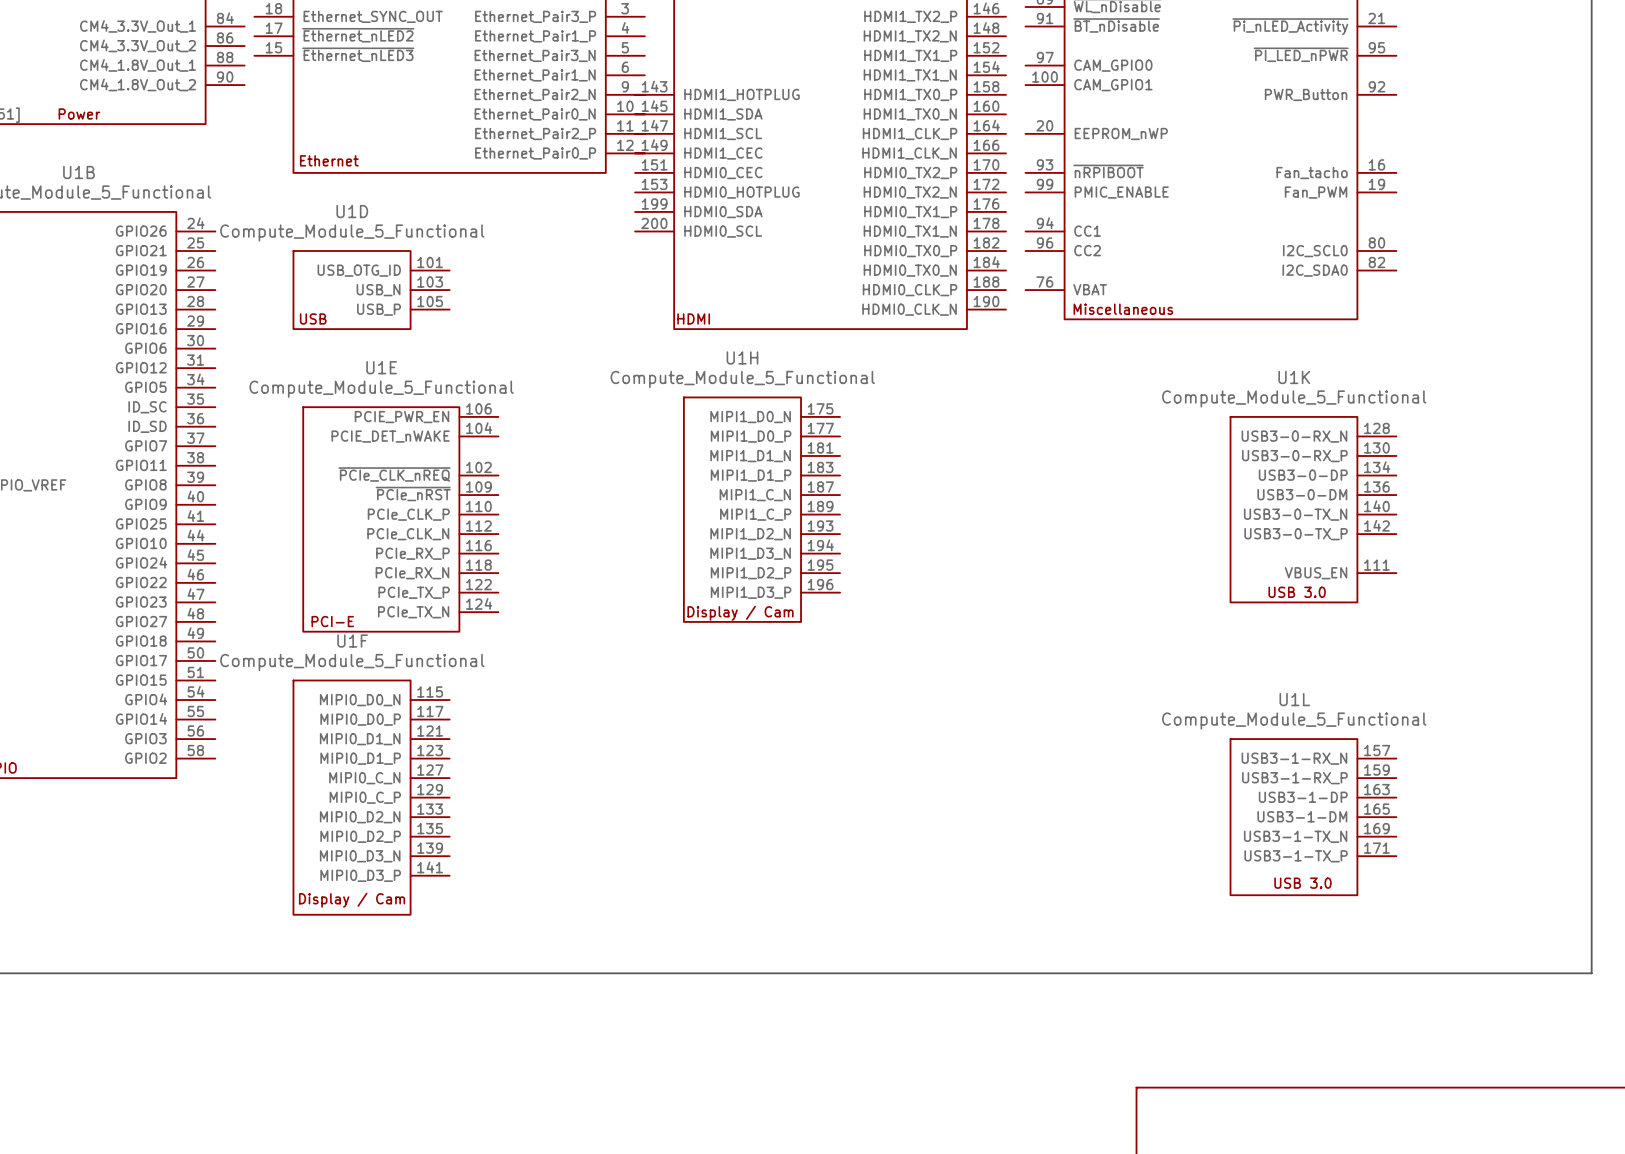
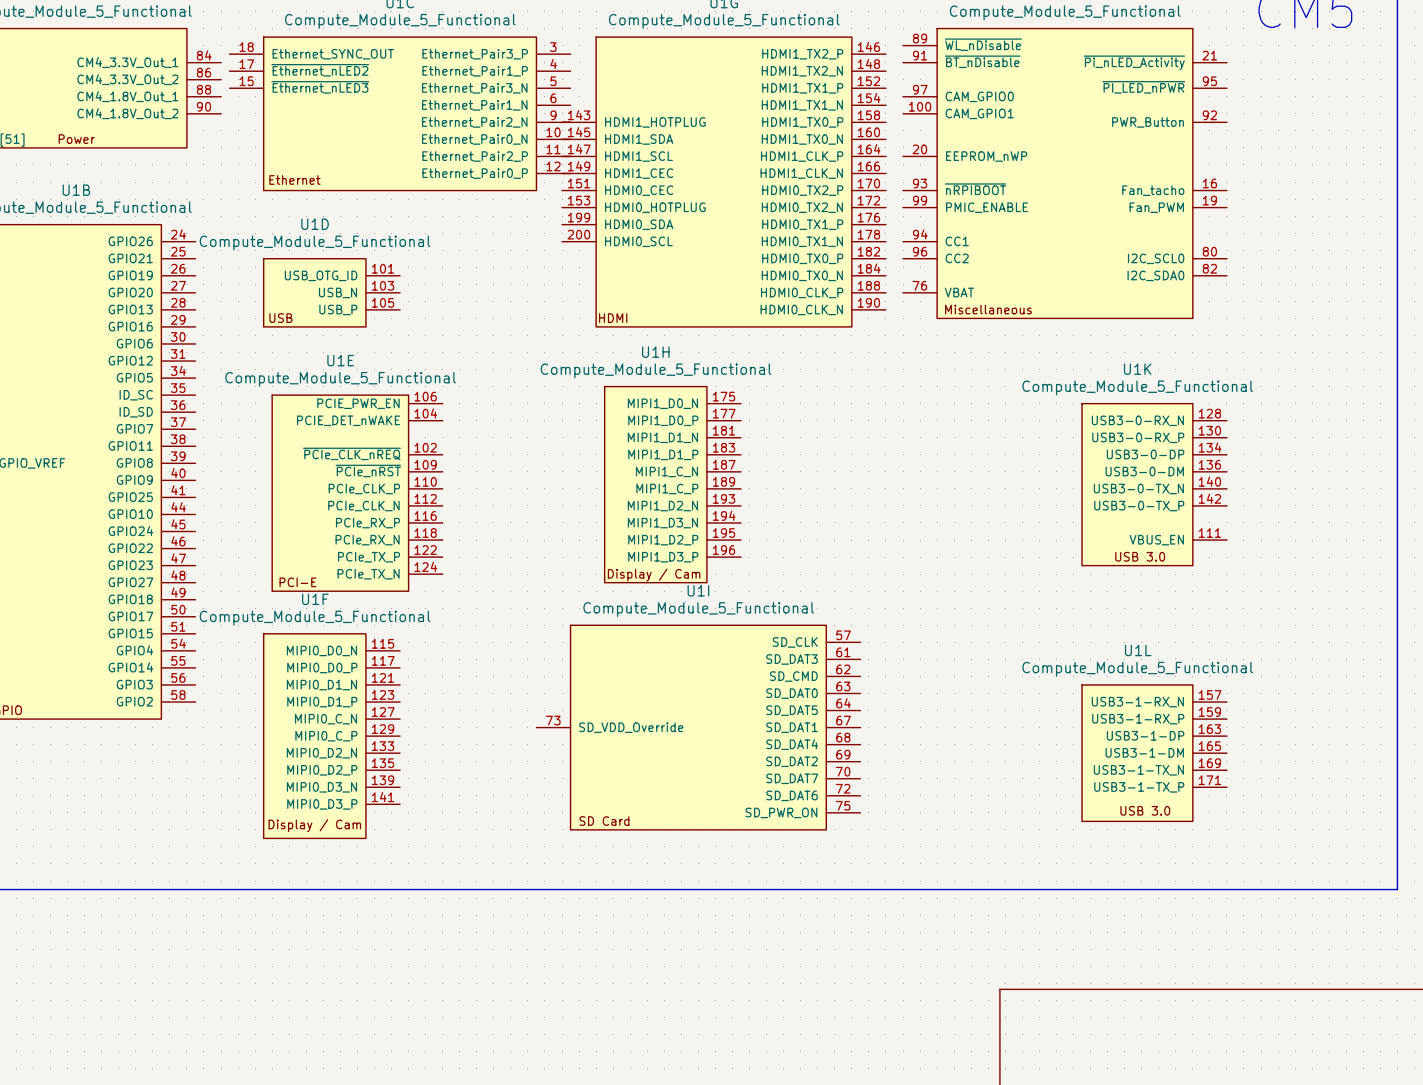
U1I: none -> Compute_Module_5_Functional (698, 727)

